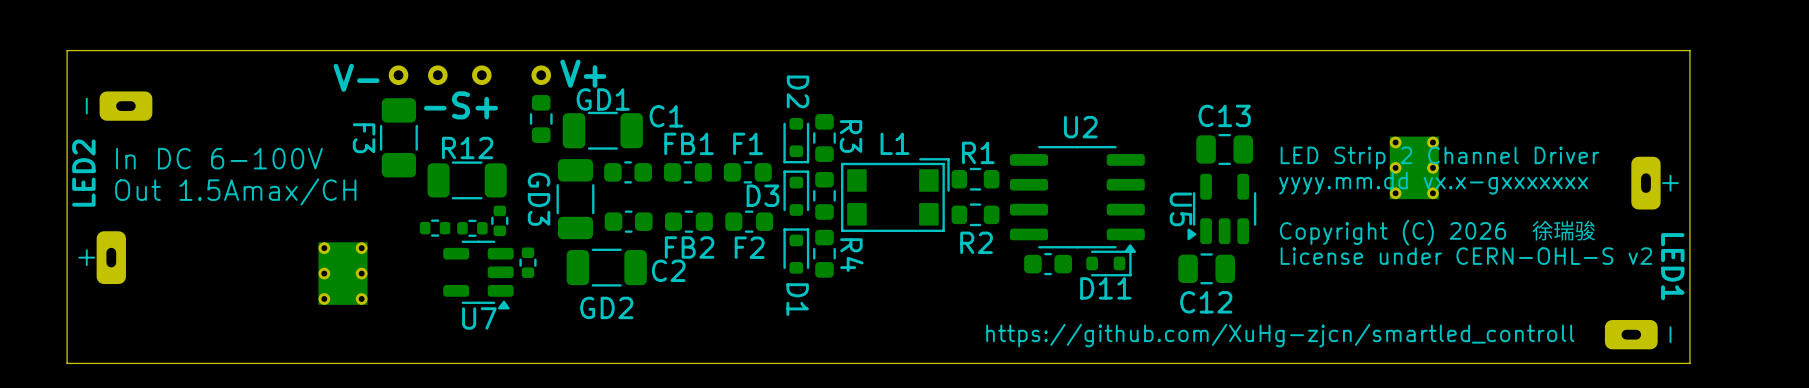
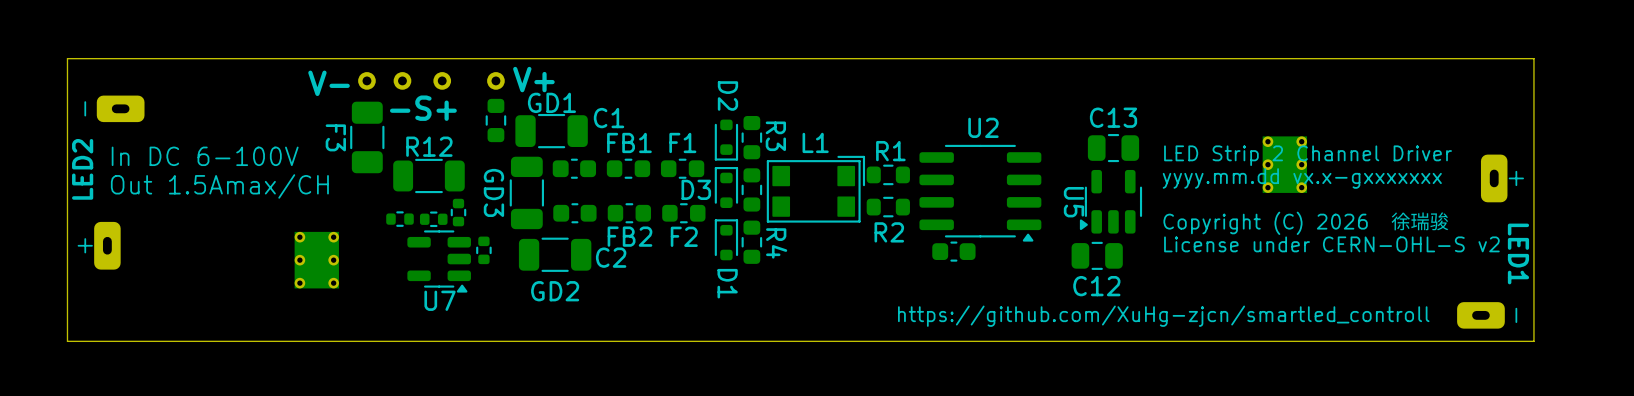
D11: (1108, 263) -> none

